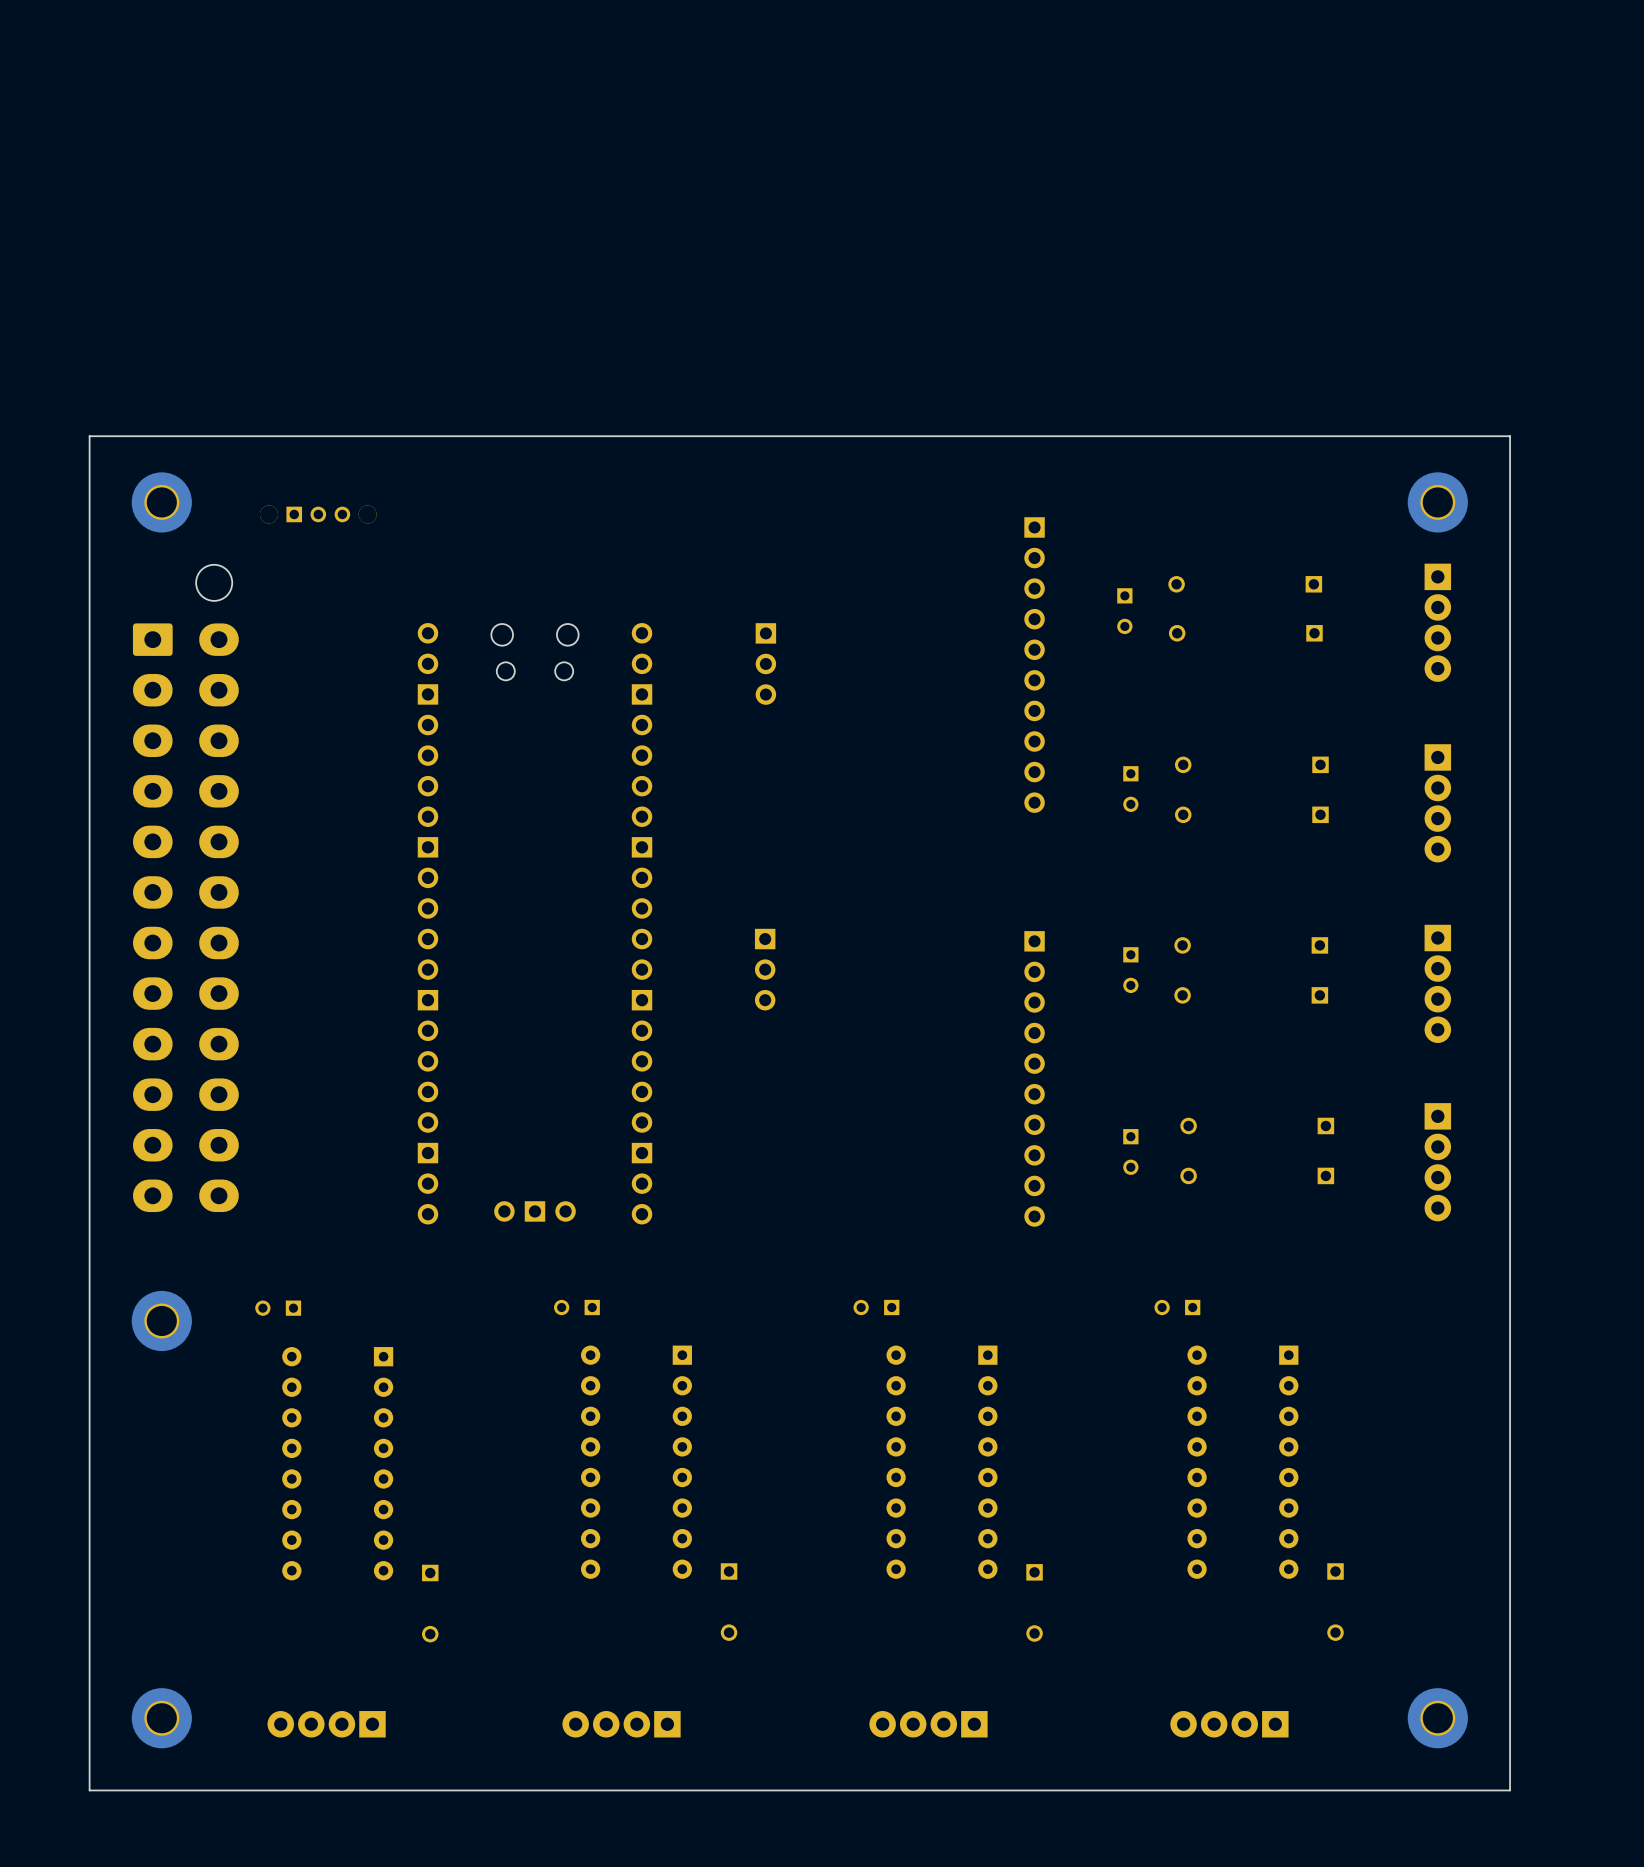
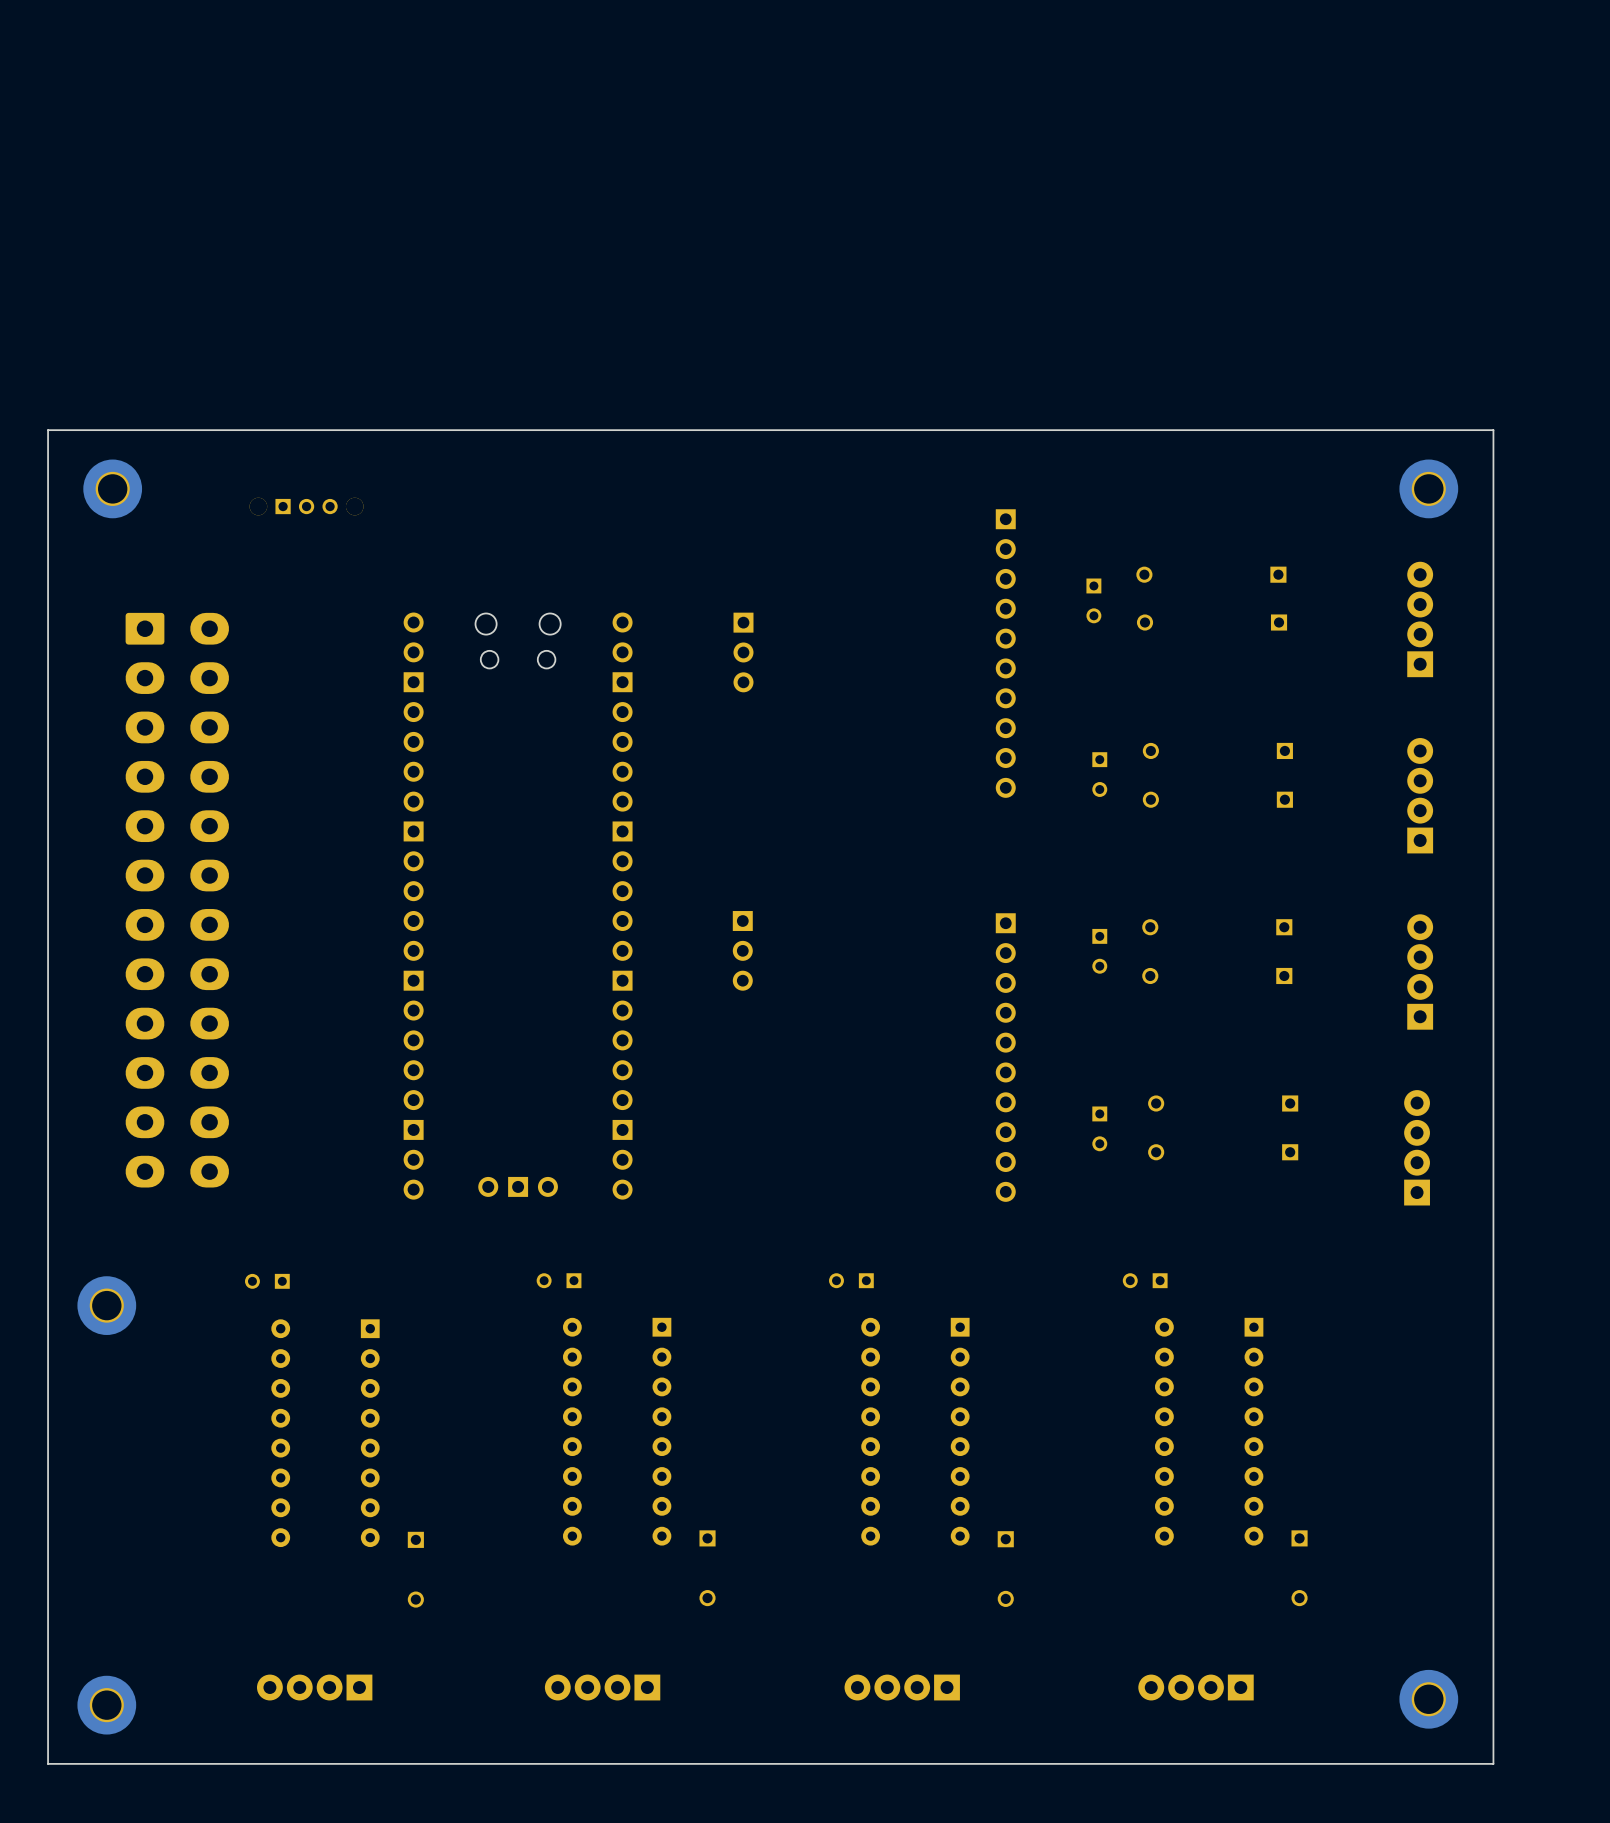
board edge: (1510, 436) (1510, 1790) (89, 1790) (89, 436) -> (1469, 430) (1493, 430) (1493, 1763) (48, 1763) (48, 430) (83, 430)
part position: (161, 502) -> (112, 488)
part position: (1437, 502) -> (1428, 488)
part rotation: 0° (1437, 622) -> 180° (1420, 619)
part rotation: 0° (1437, 803) -> 180° (1420, 795)
part: (185, 888) -> none
part rotation: 0° (1437, 983) -> 180° (1420, 971)
part rotation: 0° (1437, 1162) -> 180° (1417, 1147)
part position: (161, 1320) -> (106, 1305)
part position: (161, 1718) -> (106, 1705)
part position: (1437, 1718) -> (1428, 1699)

